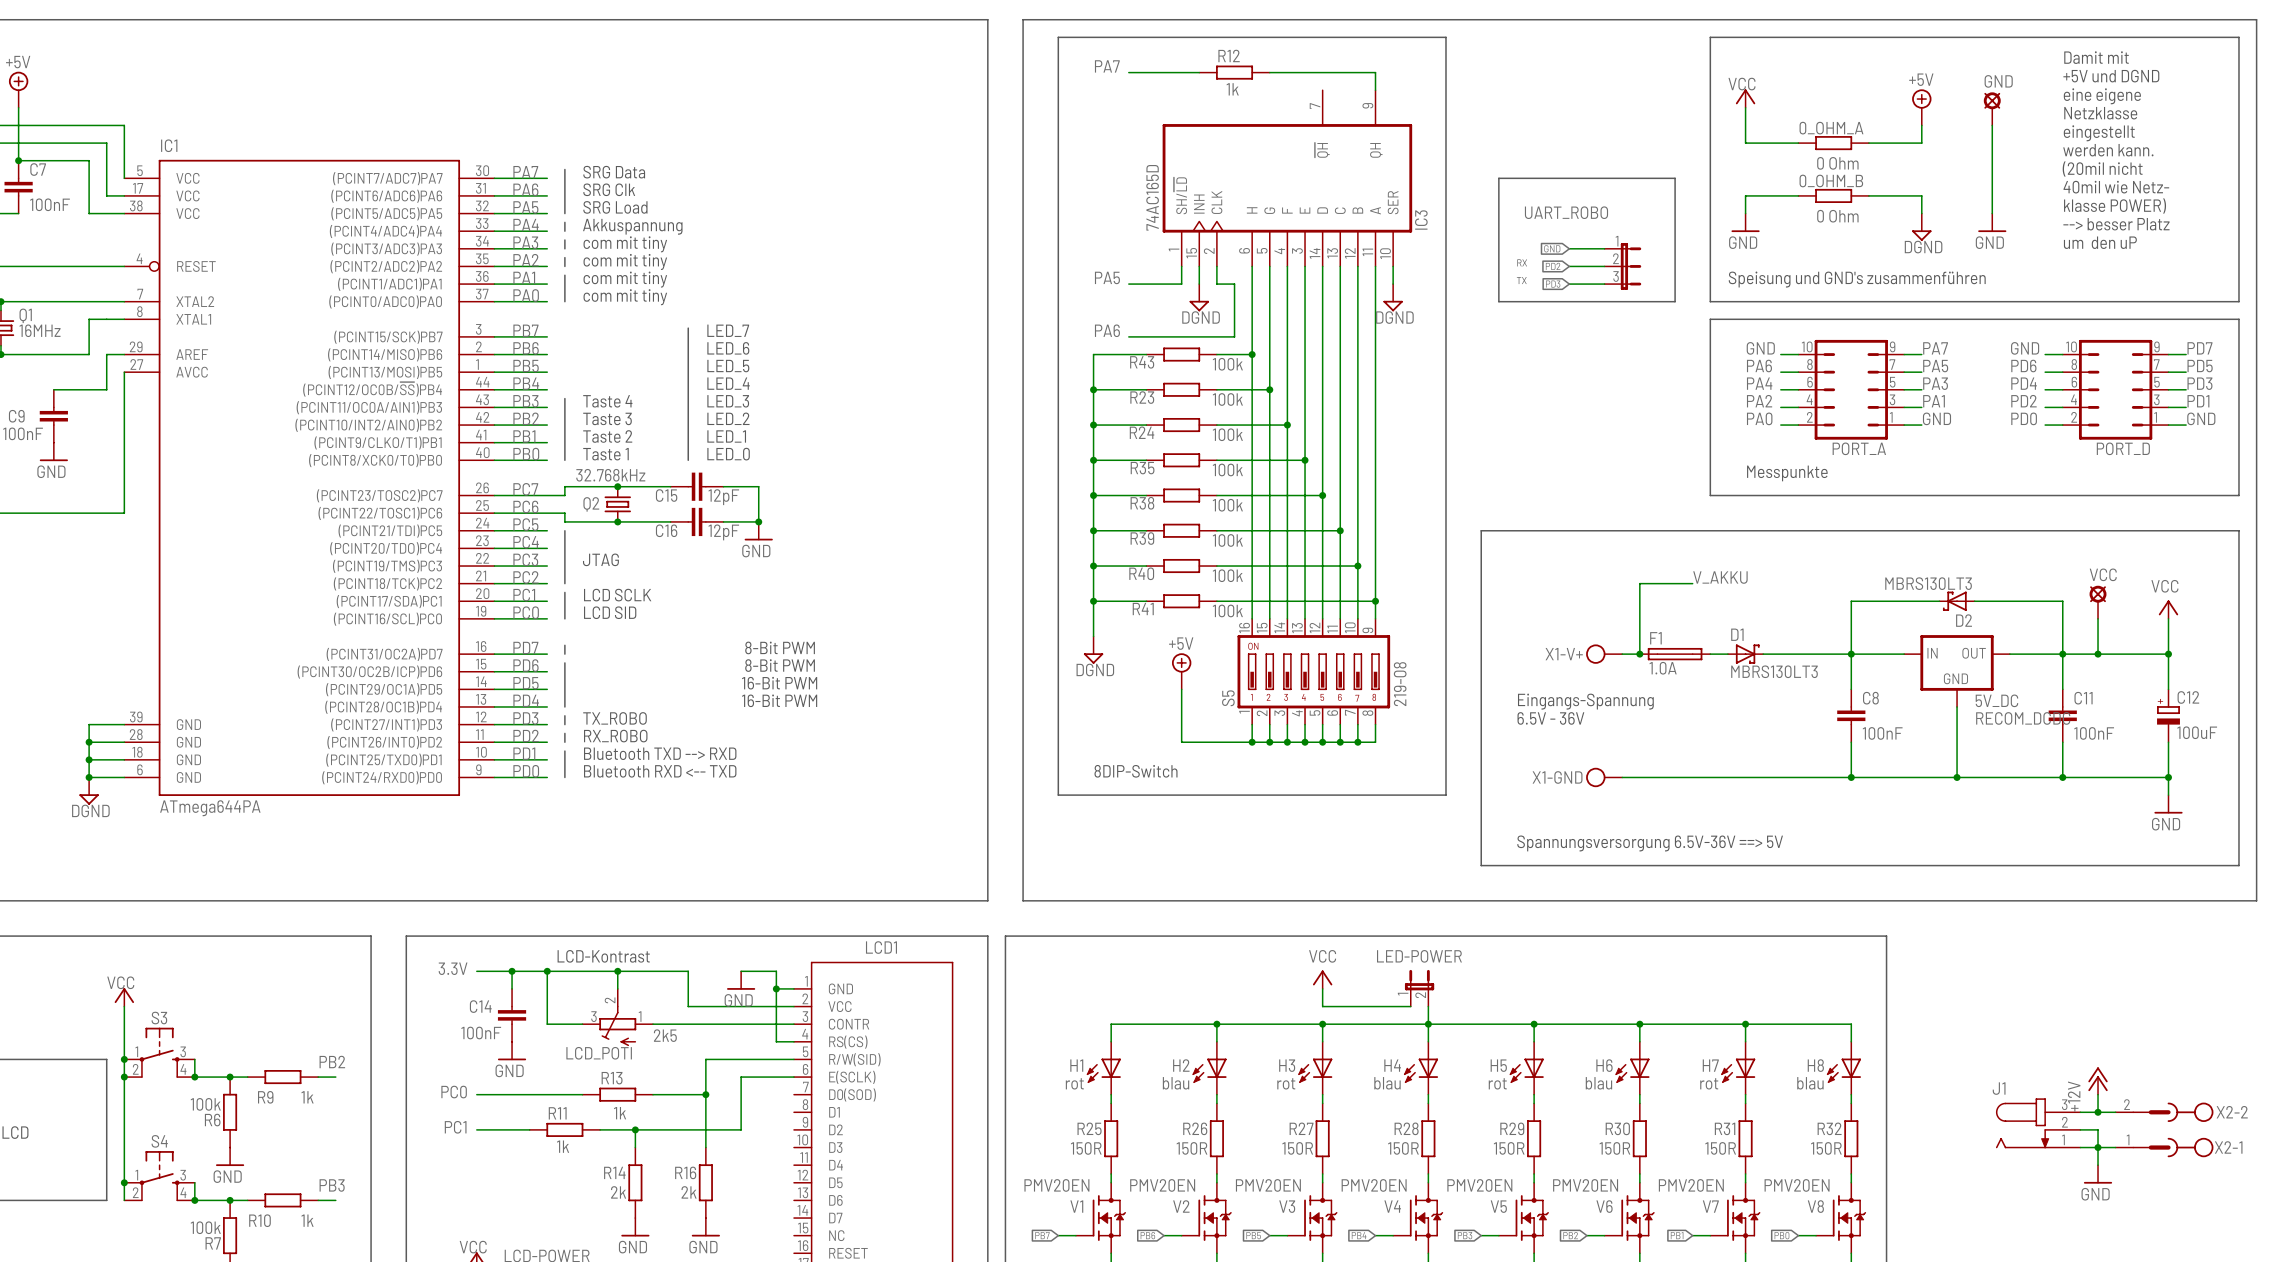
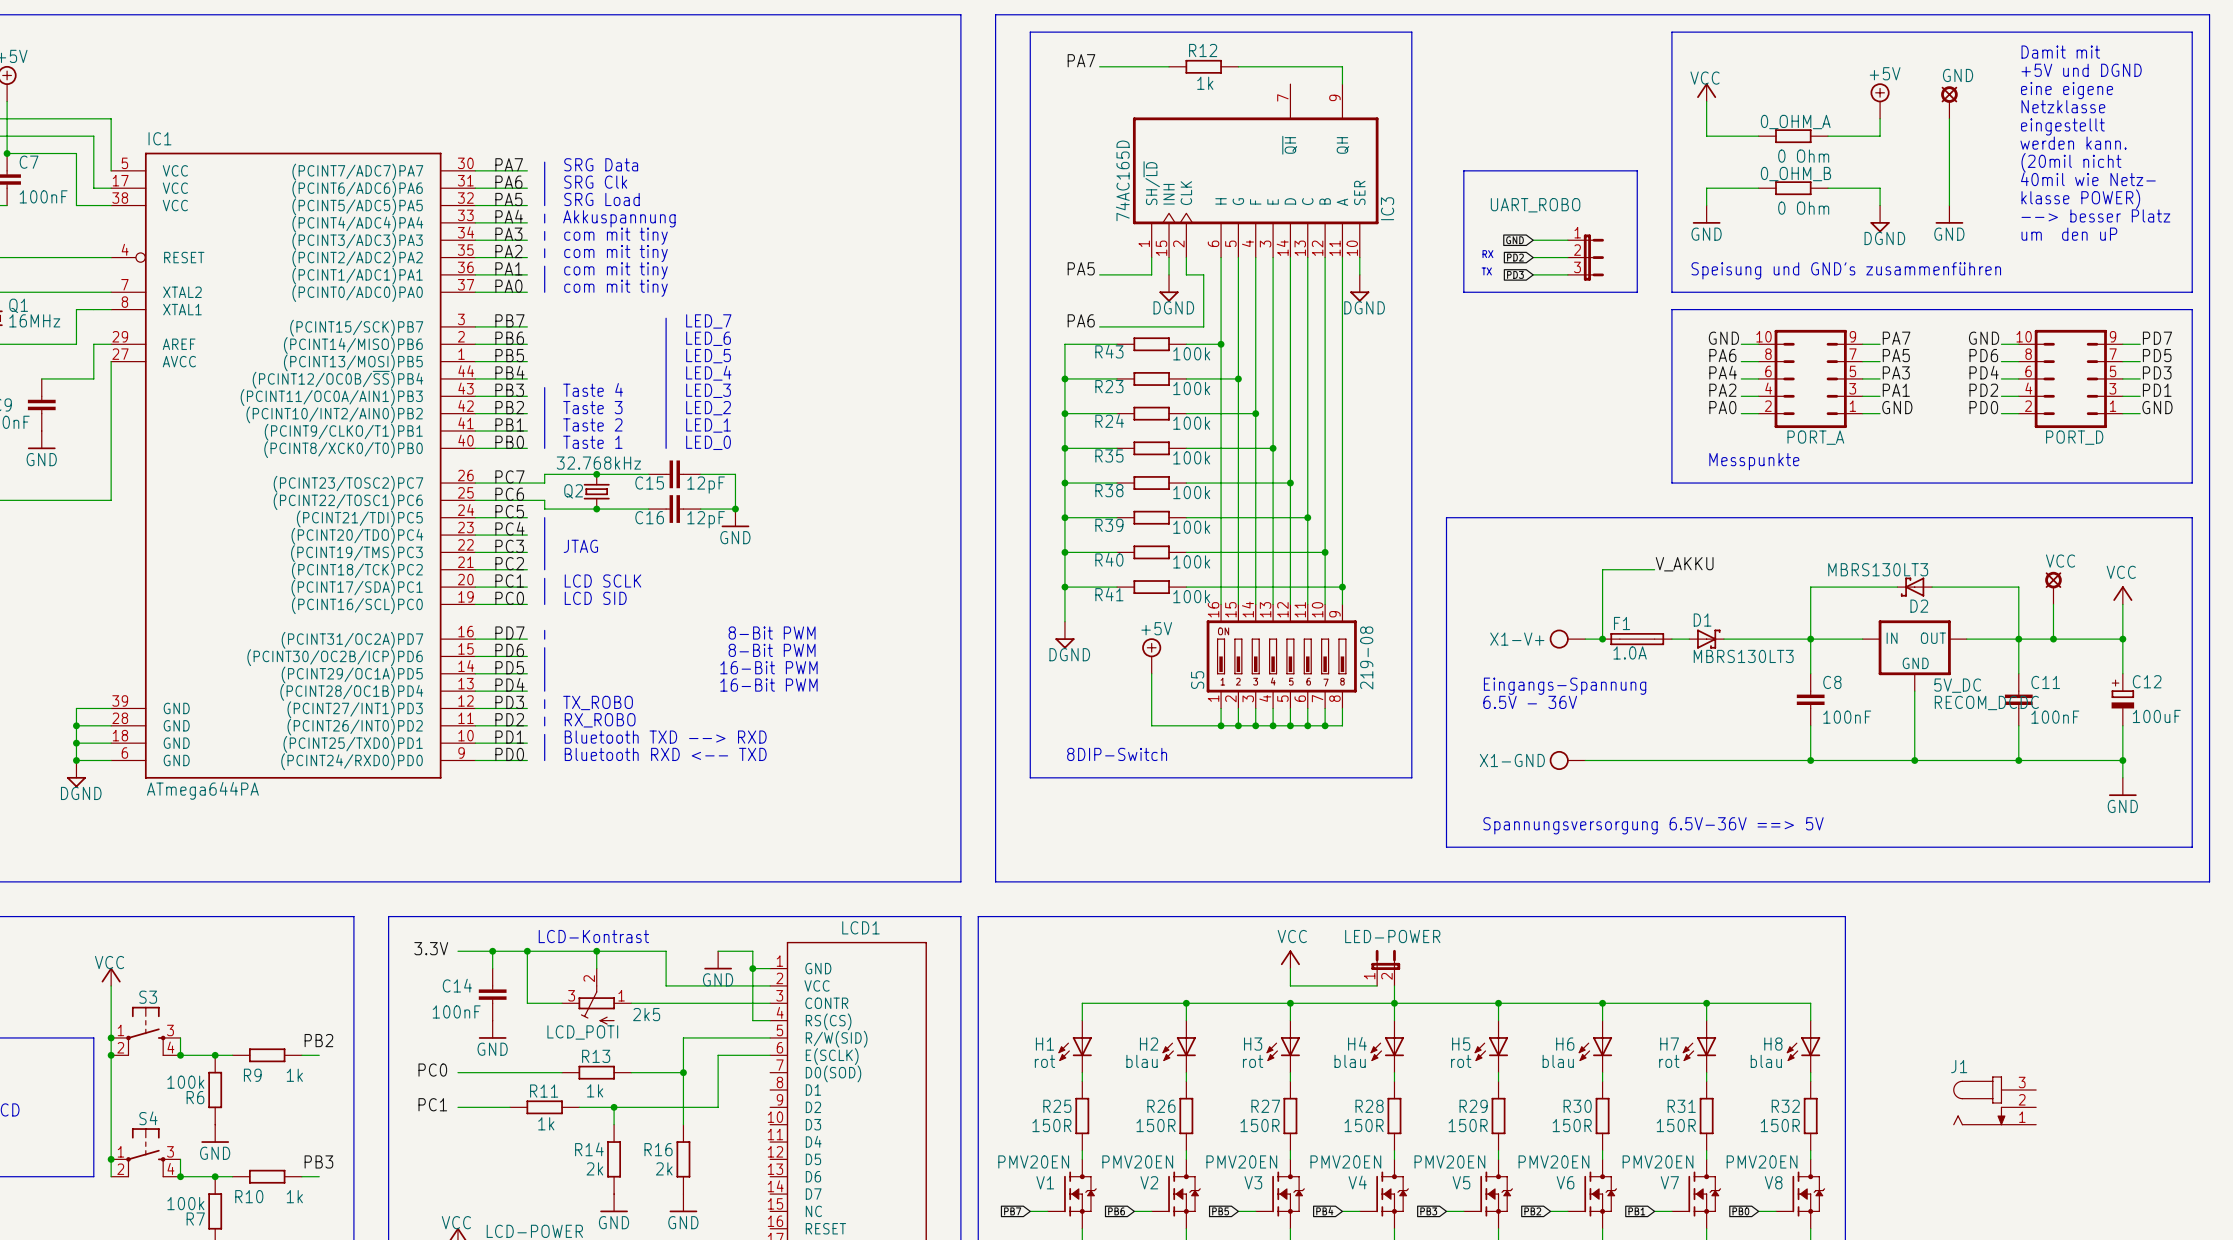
power symbol: +12V (2098, 1081) -> none
wire: (2098, 1094) (2098, 1112) -> none
wire: (2080, 1112) (2115, 1112) -> none
junction: (2098, 1112) -> none
X2-2: (2164, 1112) -> none
wire: (2080, 1129) (2098, 1129) (2098, 1165) -> none
wire: (2080, 1147) (2115, 1147) -> none
junction: (2098, 1147) -> none
X2-1: (2164, 1147) -> none
power symbol: GND (2098, 1174) -> none

